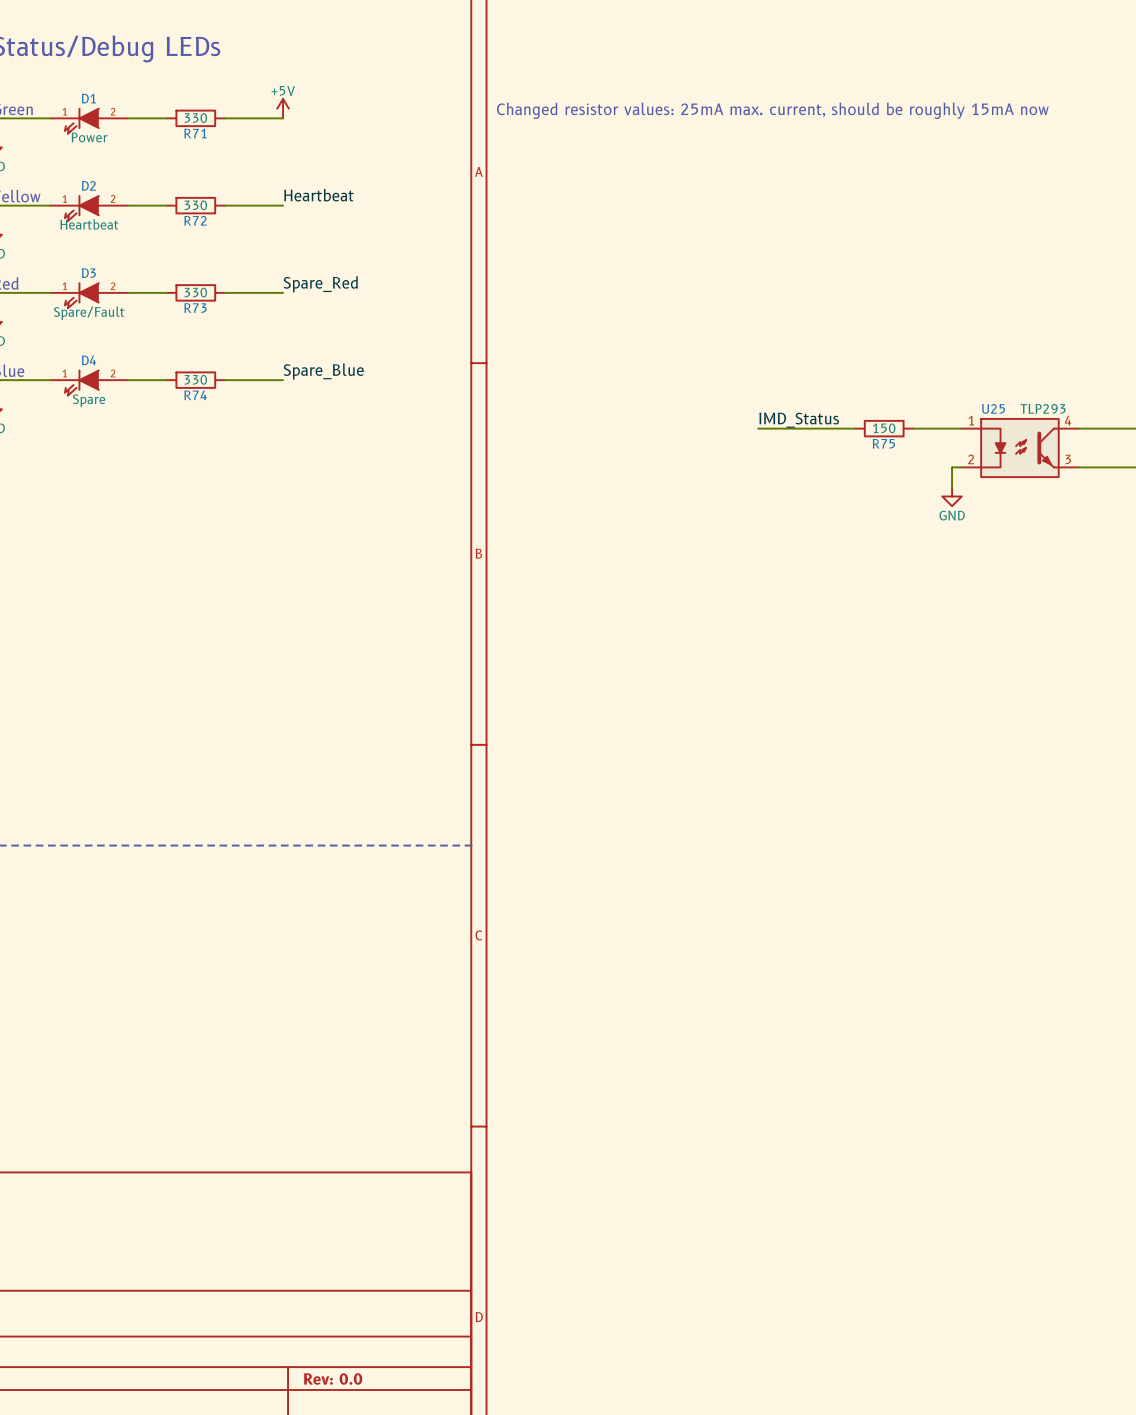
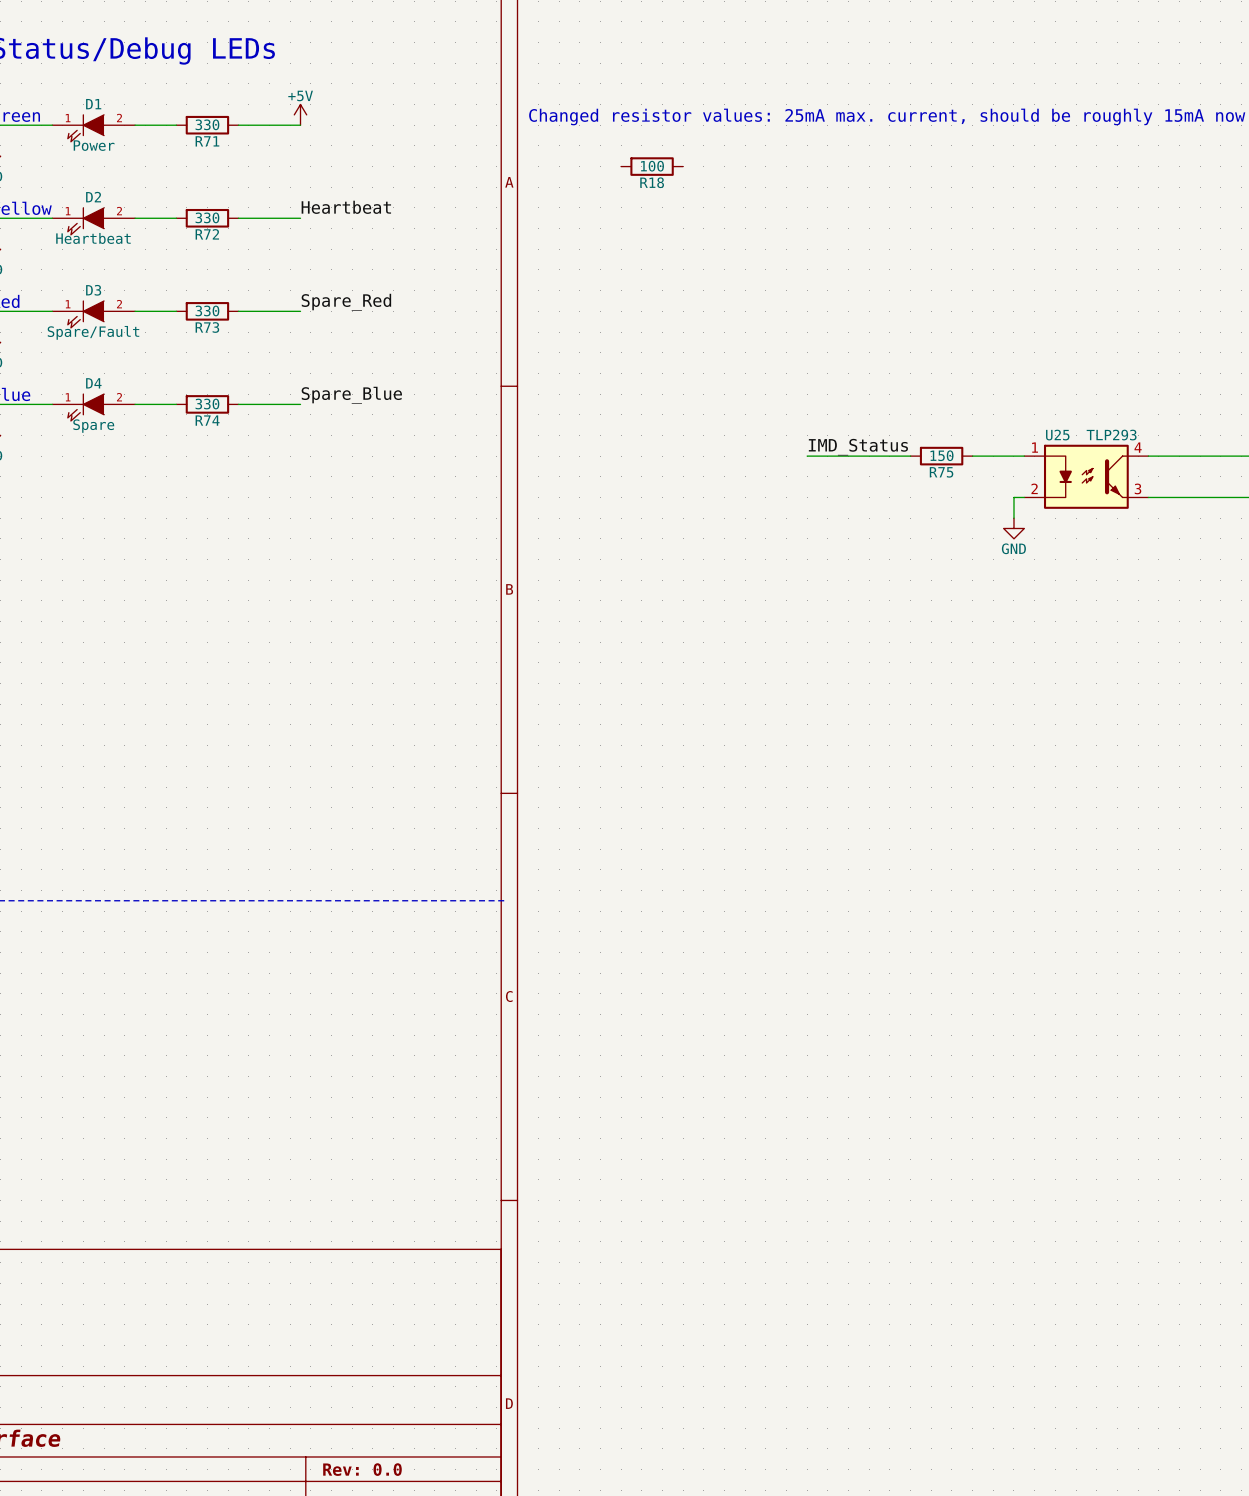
R18: none -> 100 (652, 166)

